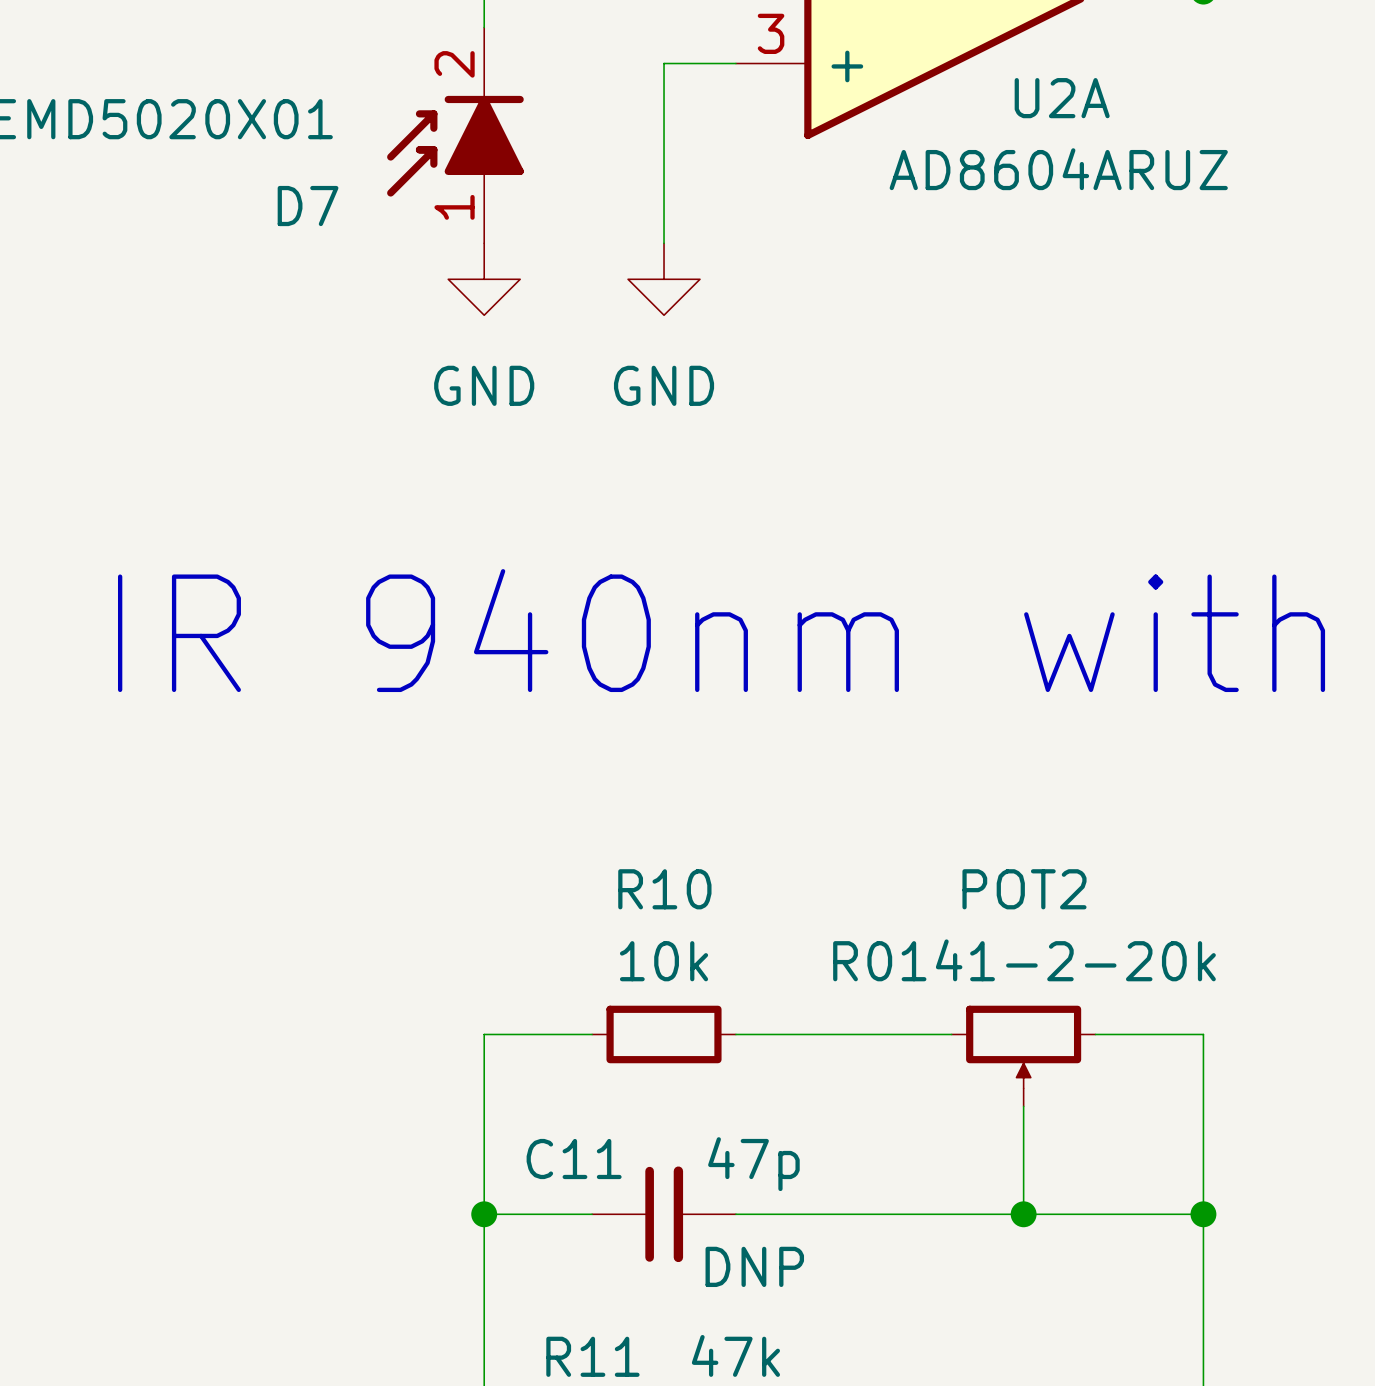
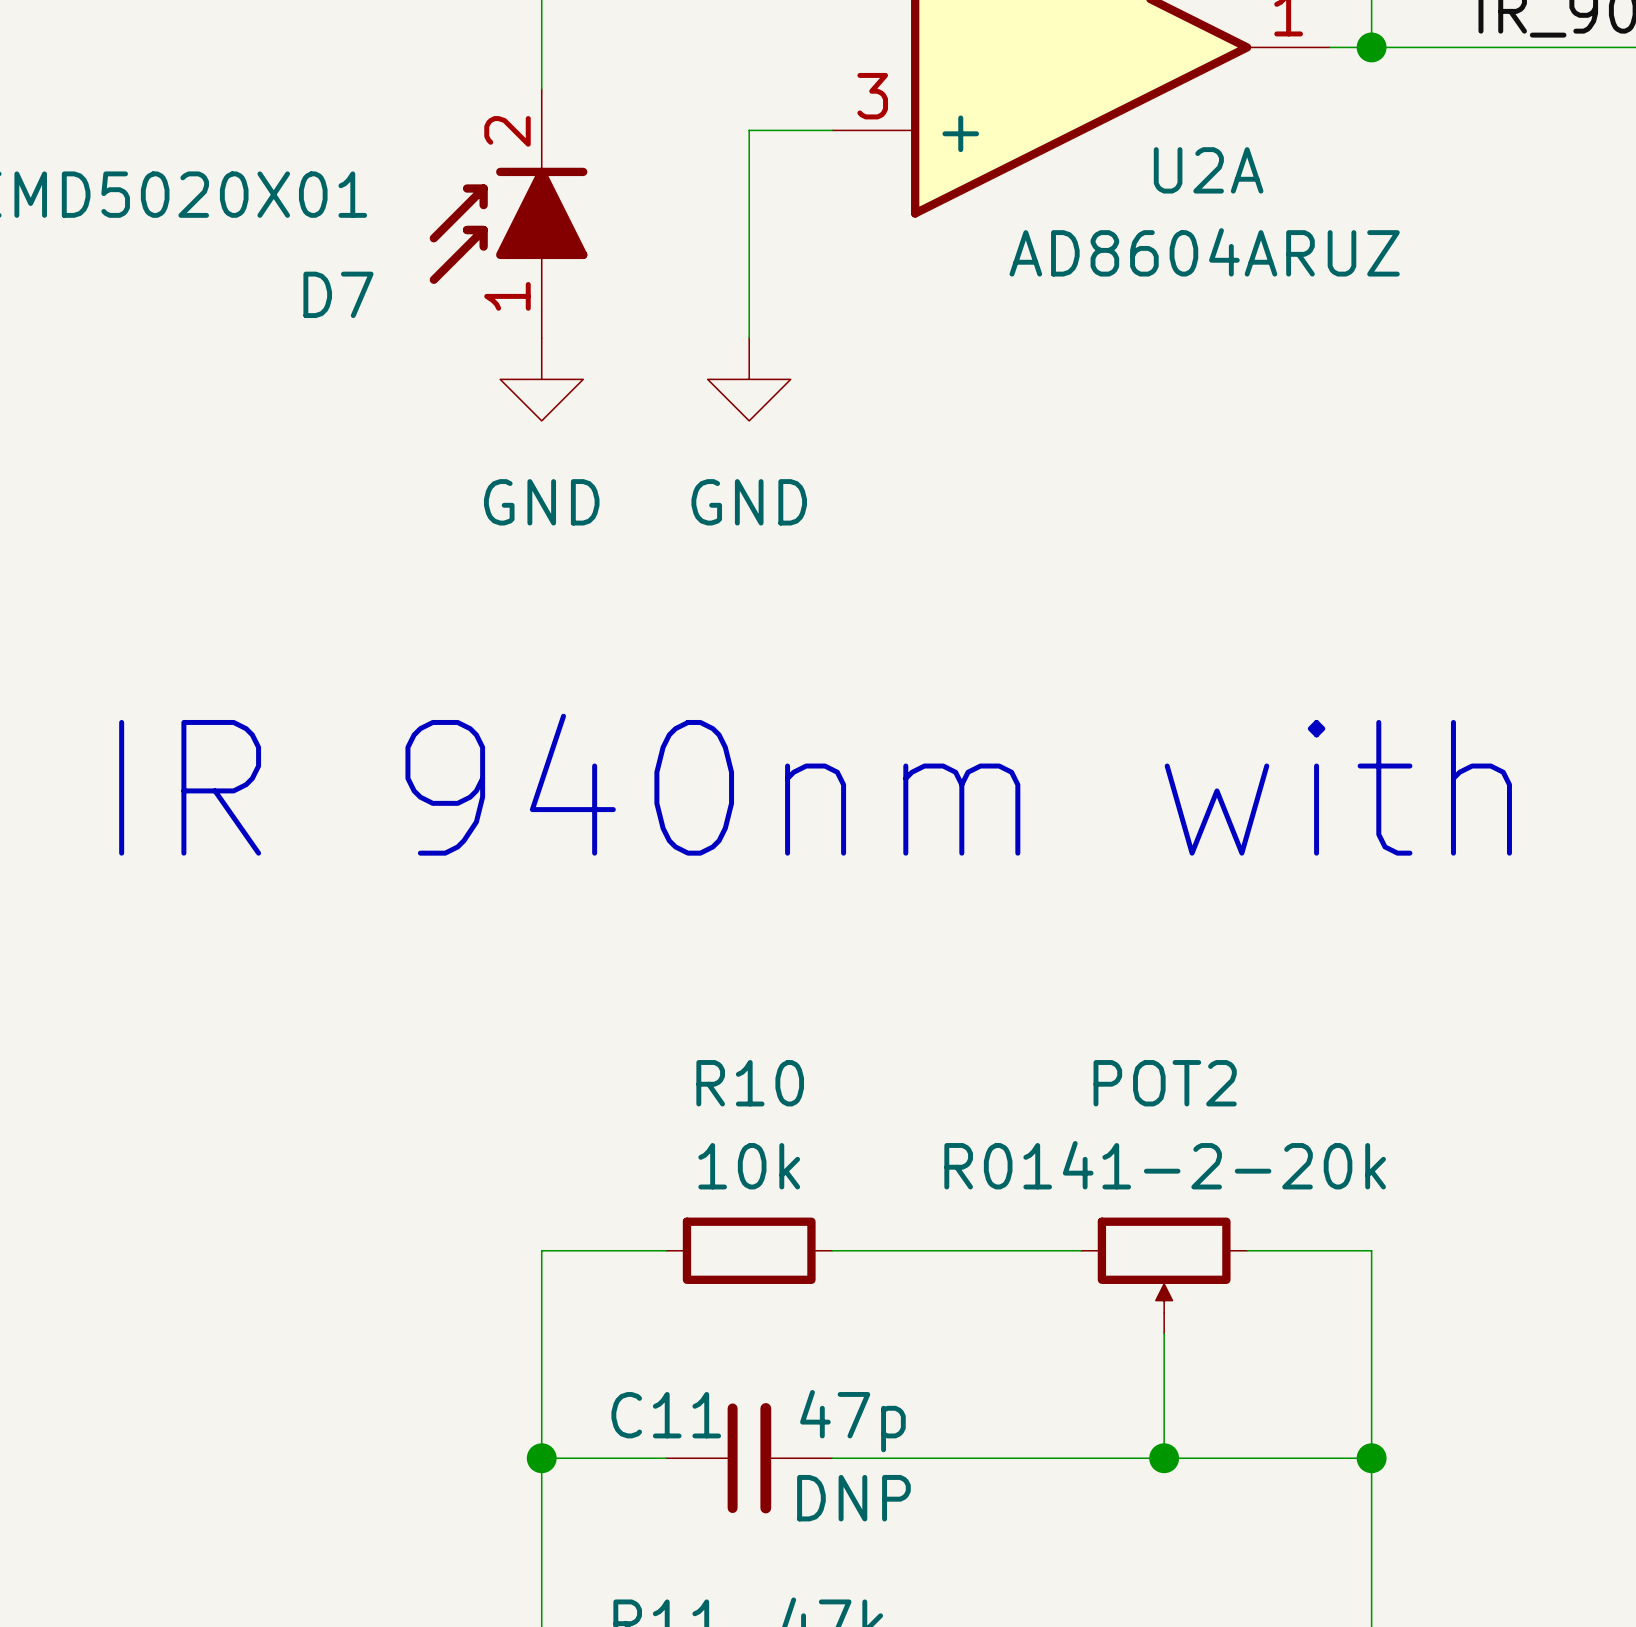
C11 name position: C11 (574, 1159) -> C11 (666, 1415)
C11 text position: 47p (753, 1164) -> 47p (852, 1421)
C11 text position: DNP (754, 1266) -> DNP (853, 1498)

